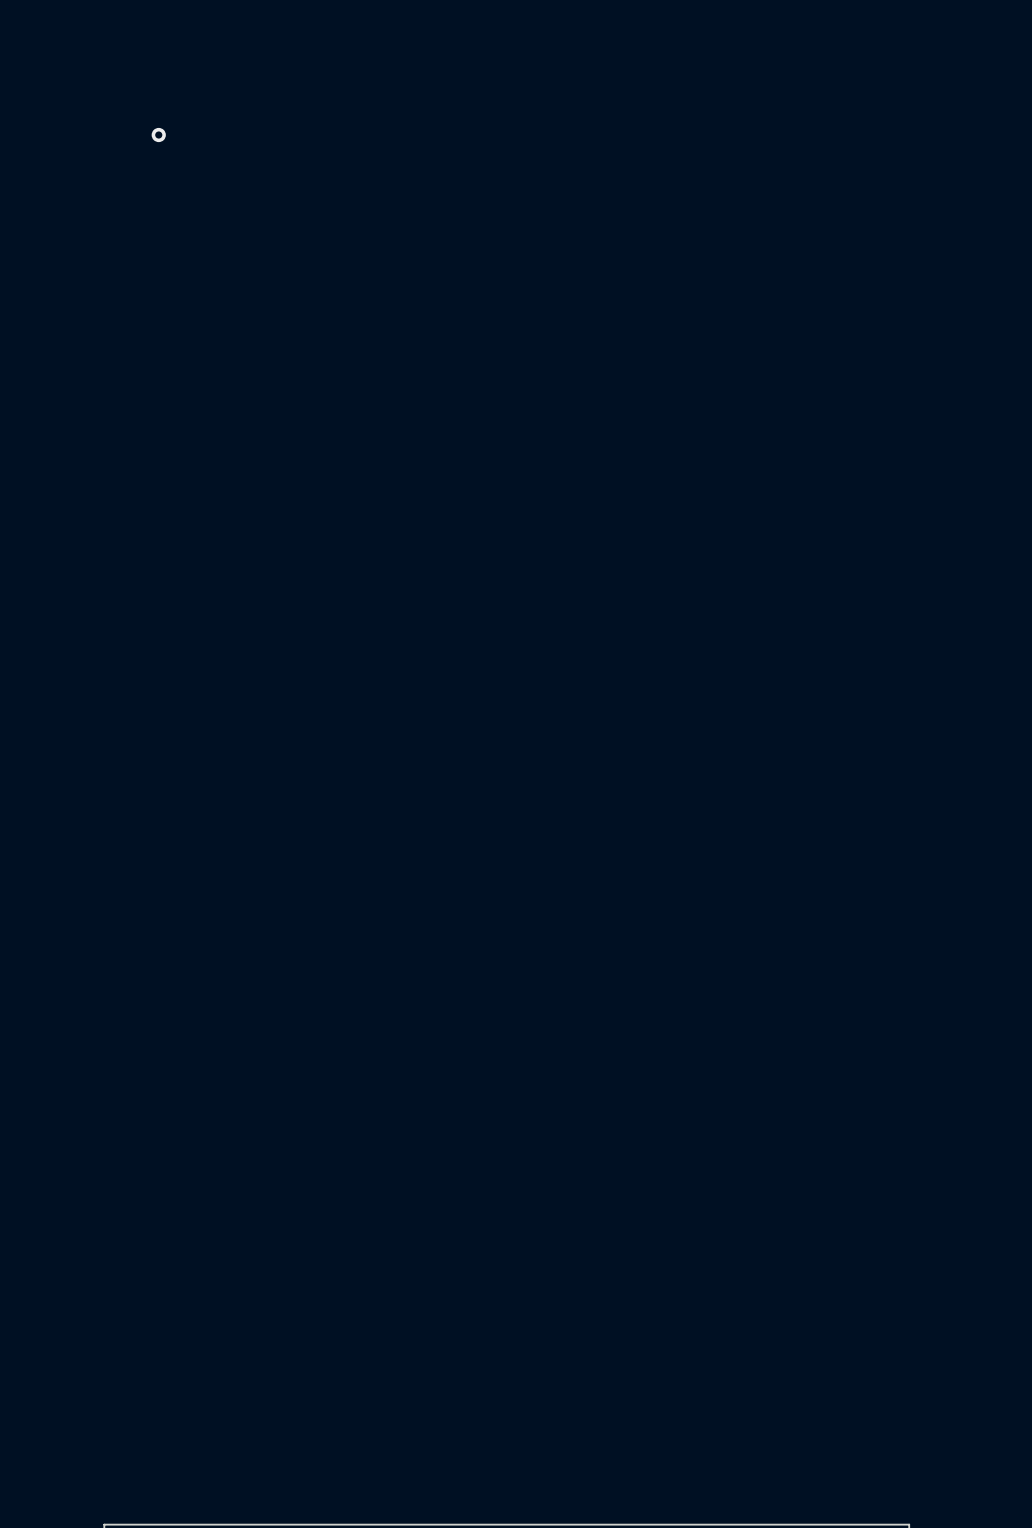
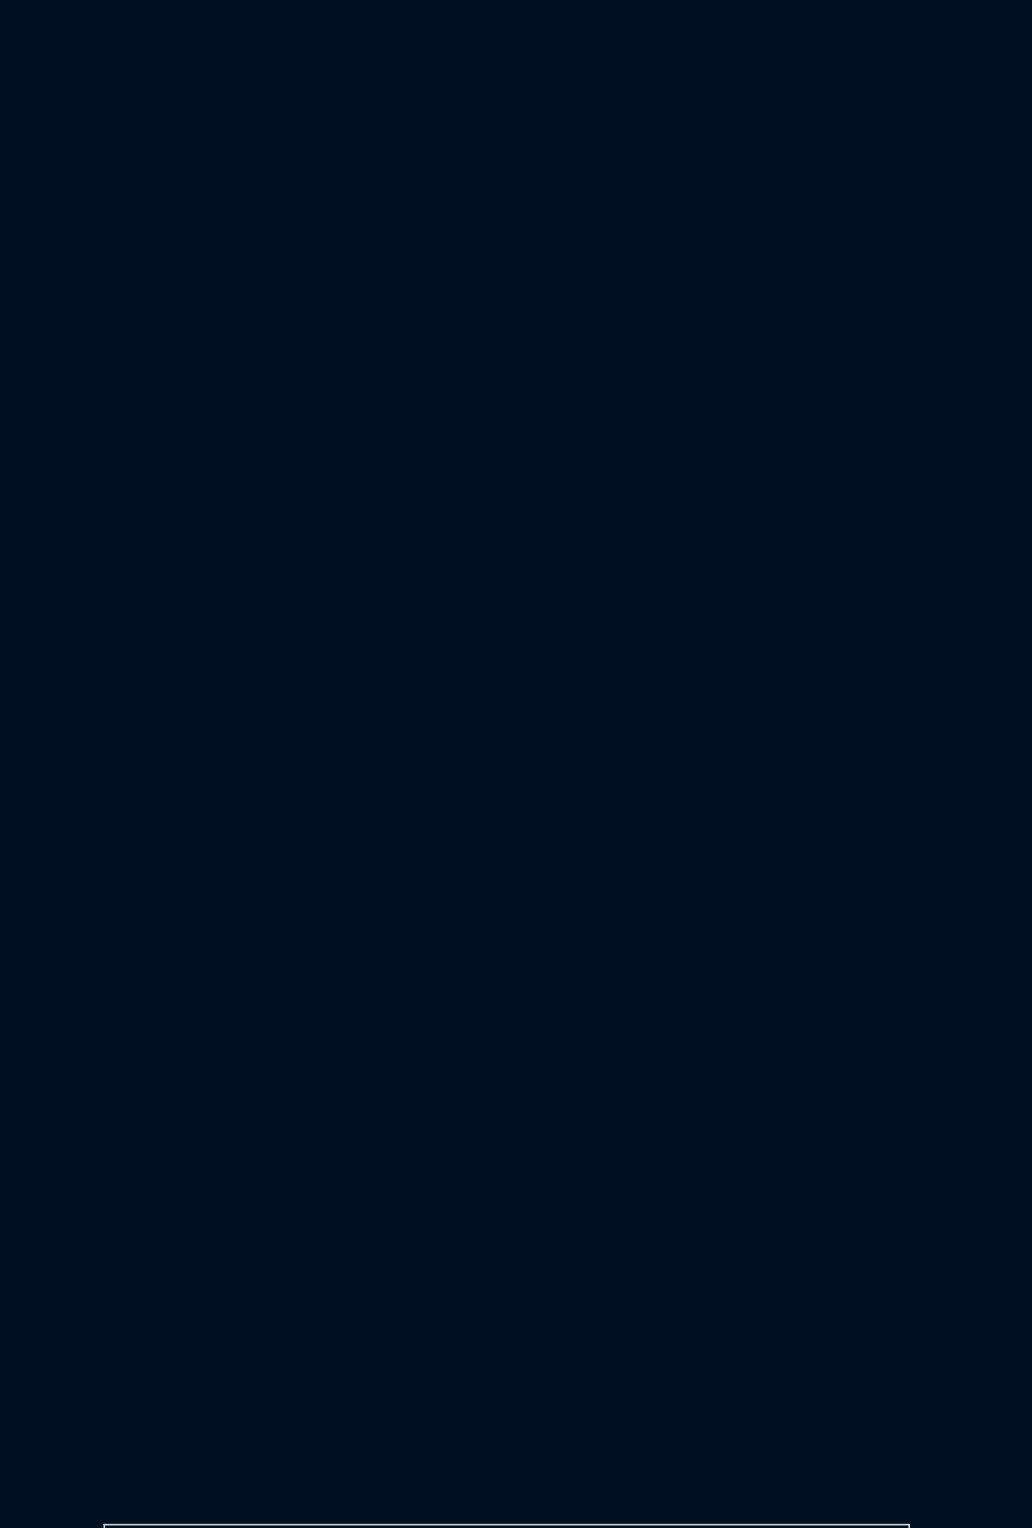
via: (158, 135) -> none

